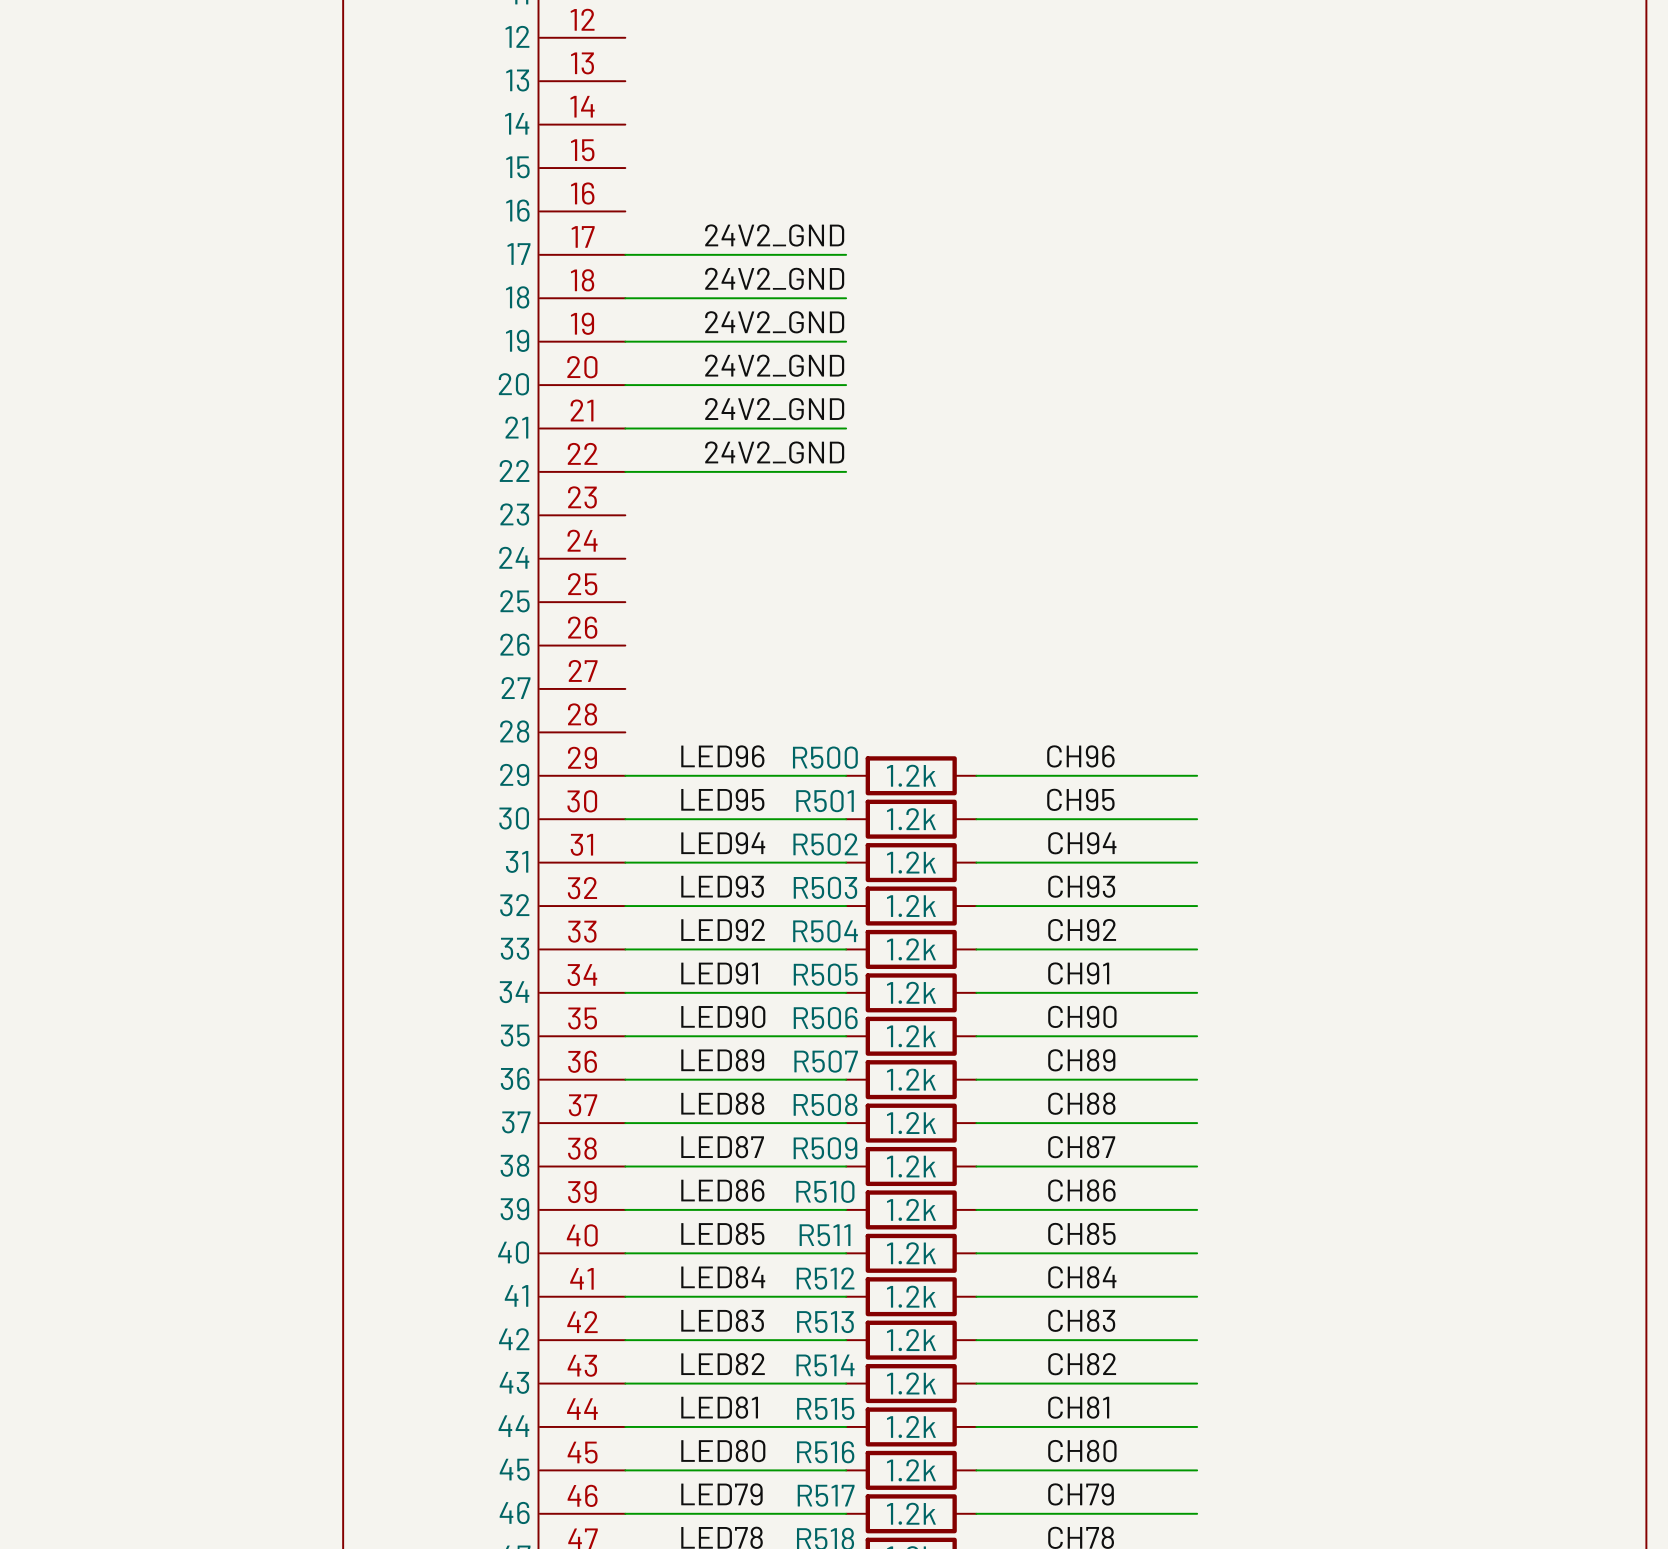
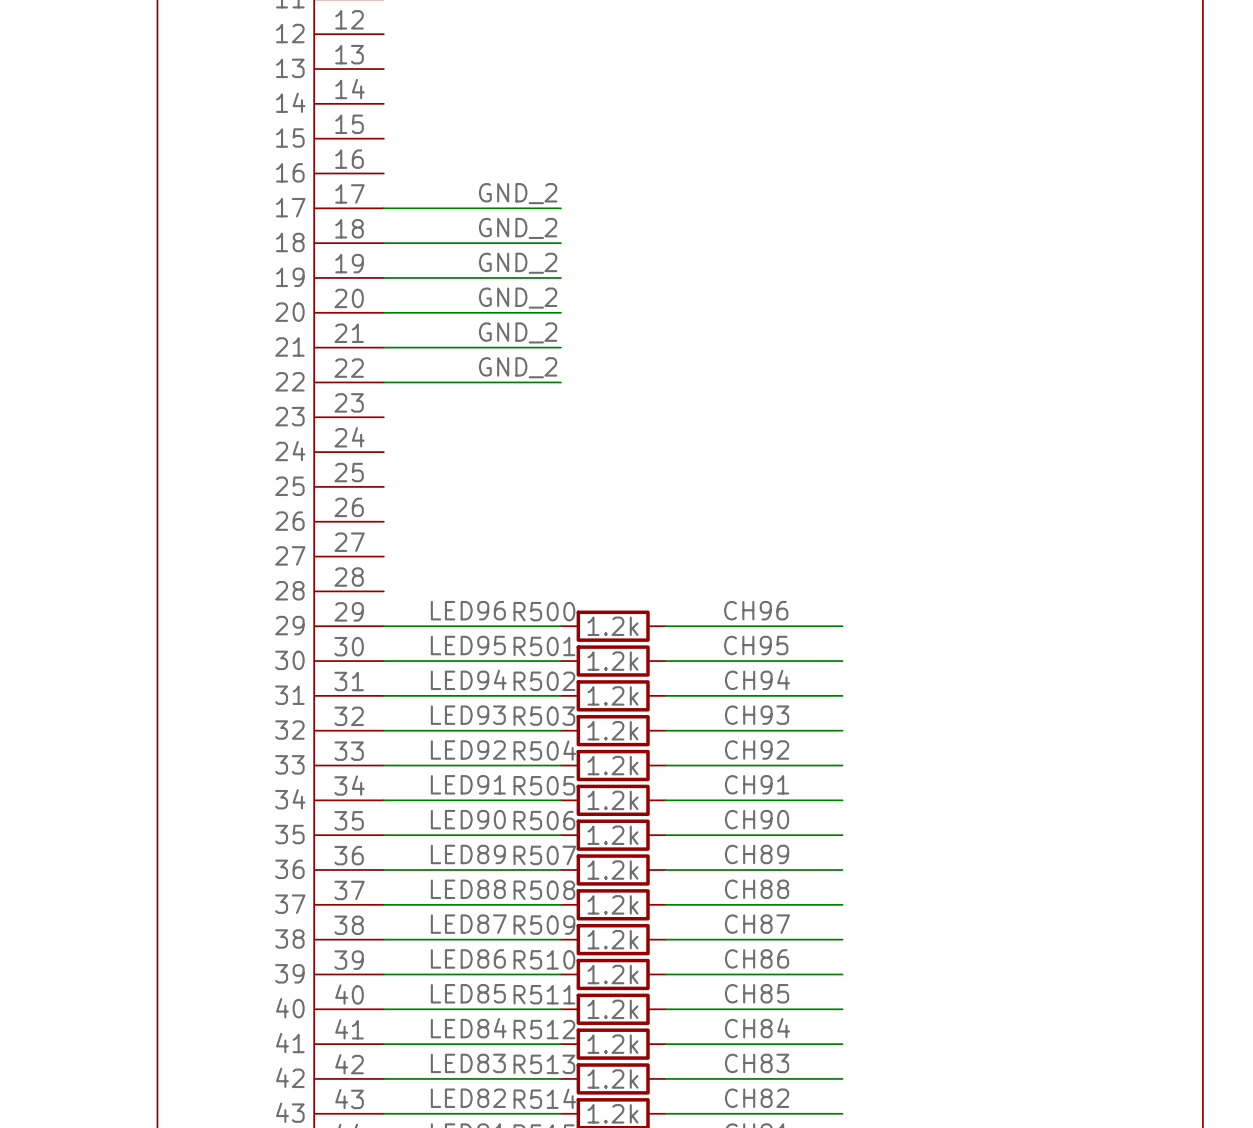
label: 24V2_GND (774, 235) -> GND_2 (518, 193)
label: 24V2_GND (774, 278) -> GND_2 (518, 228)
label: 24V2_GND (774, 322) -> GND_2 (518, 263)
label: 24V2_GND (774, 365) -> GND_2 (518, 298)
label: 24V2_GND (774, 409) -> GND_2 (518, 332)
label: 24V2_GND (774, 452) -> GND_2 (518, 367)

